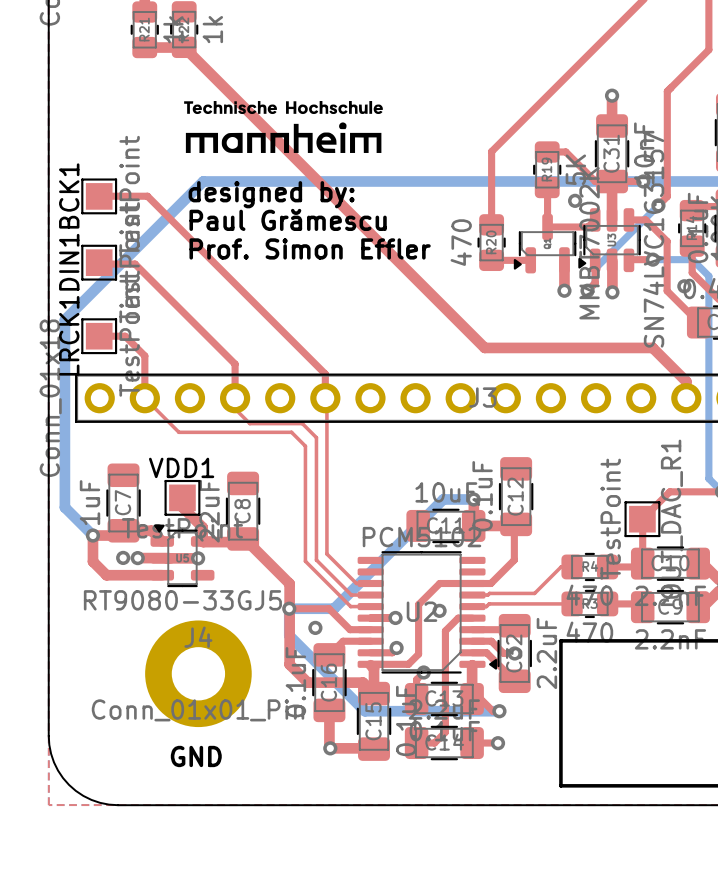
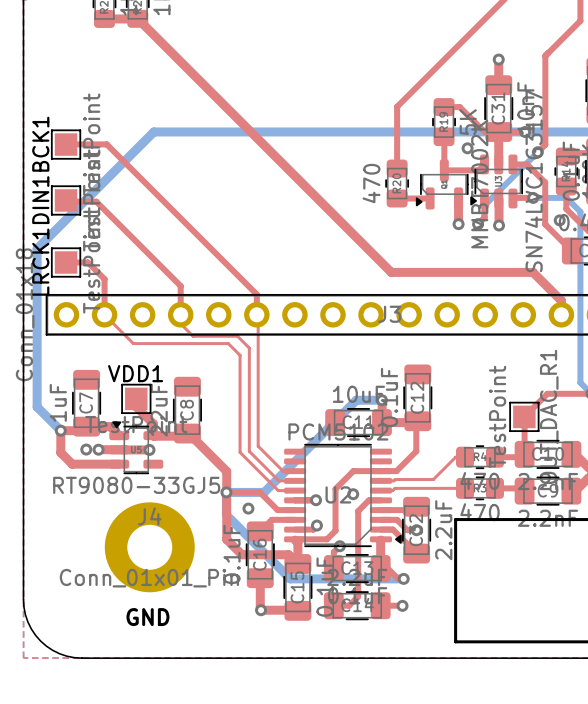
drawing: [184, 101, 383, 153] -> none
text: designed by: (271, 194) -> none
text: Paul Grămescu (288, 219) -> none
text: Prof. Simon Effler (310, 248) -> none

